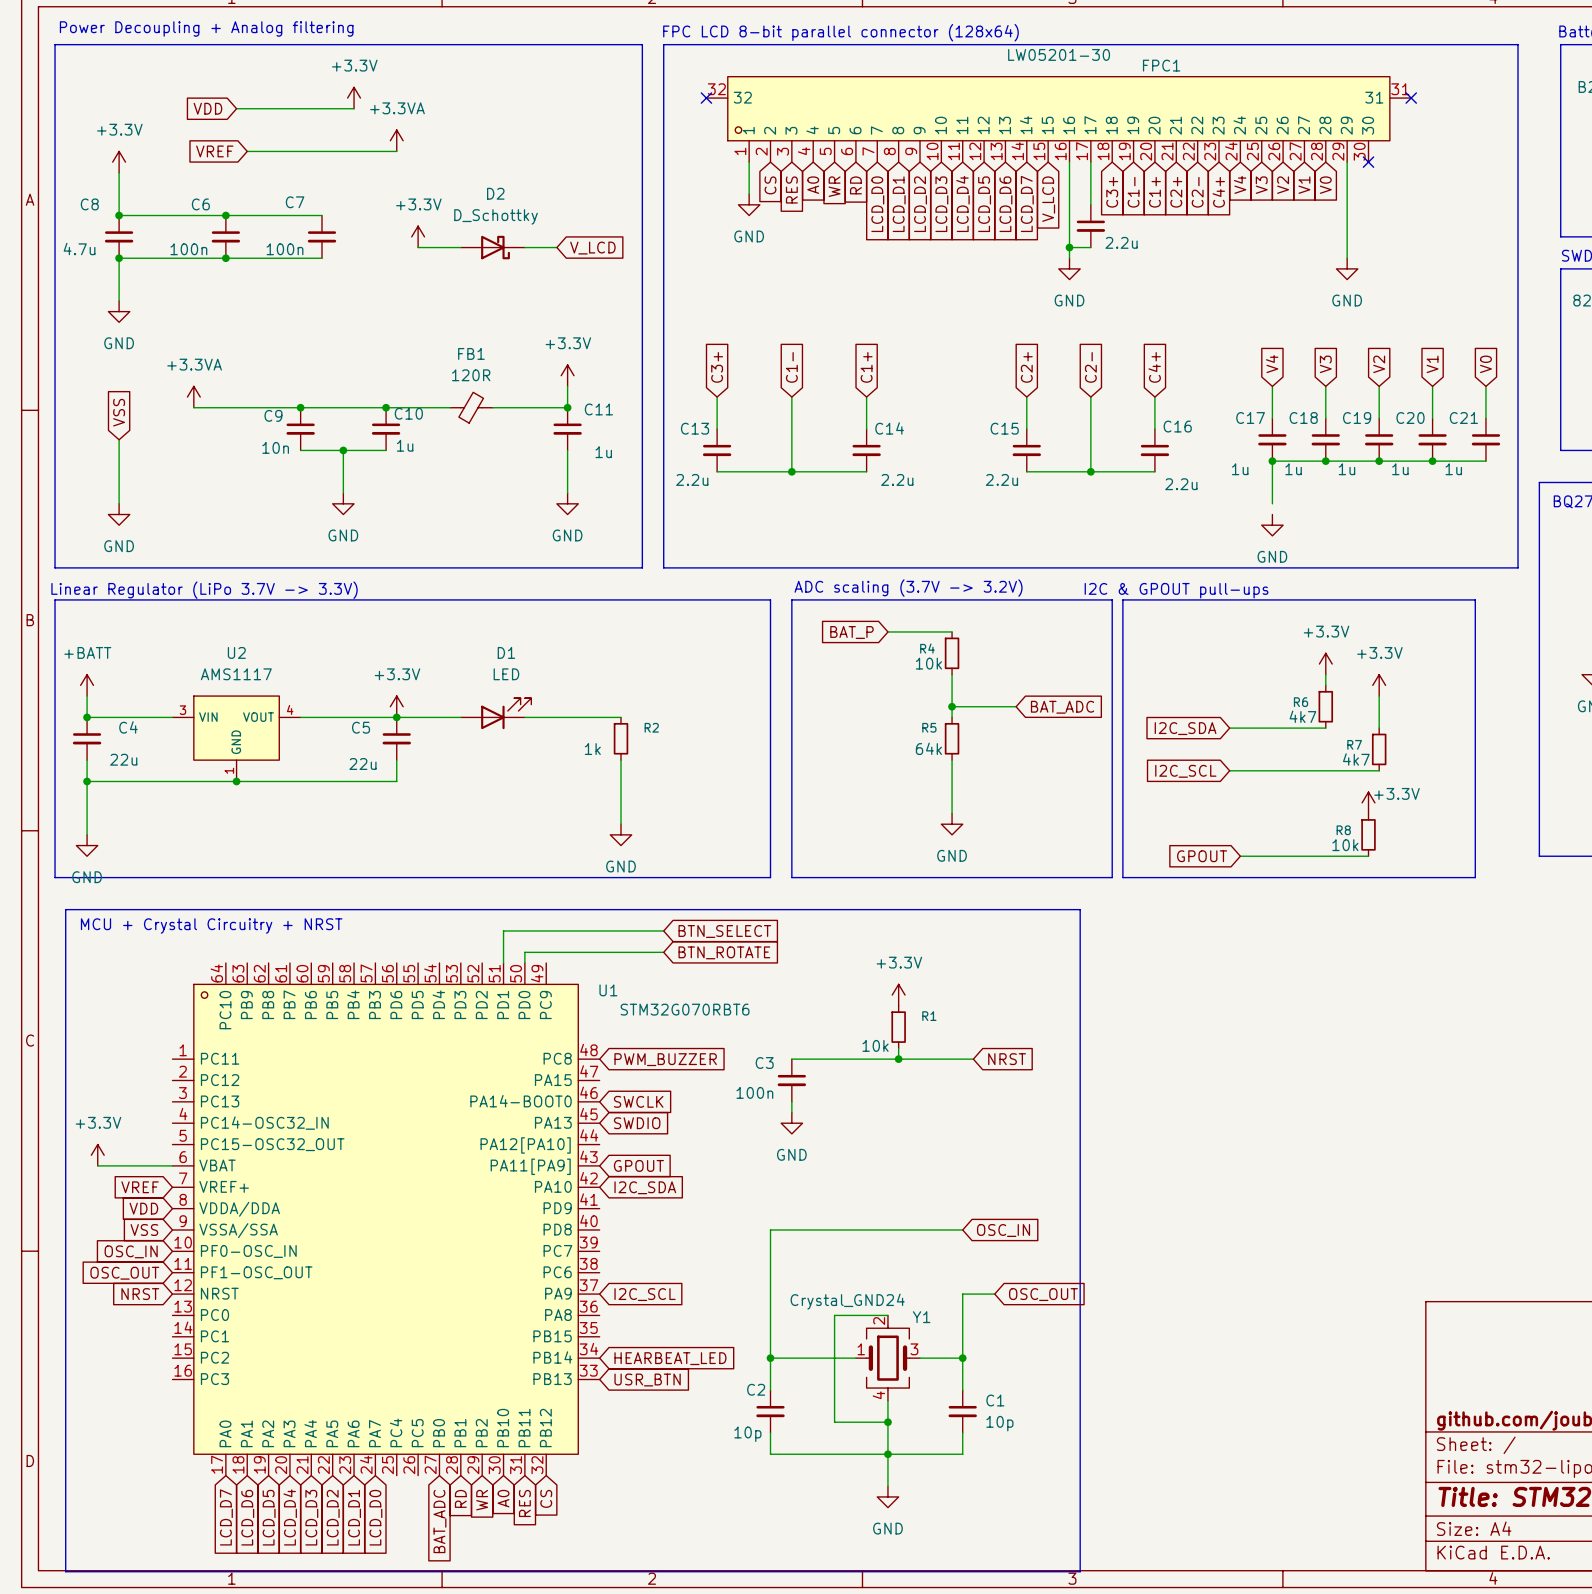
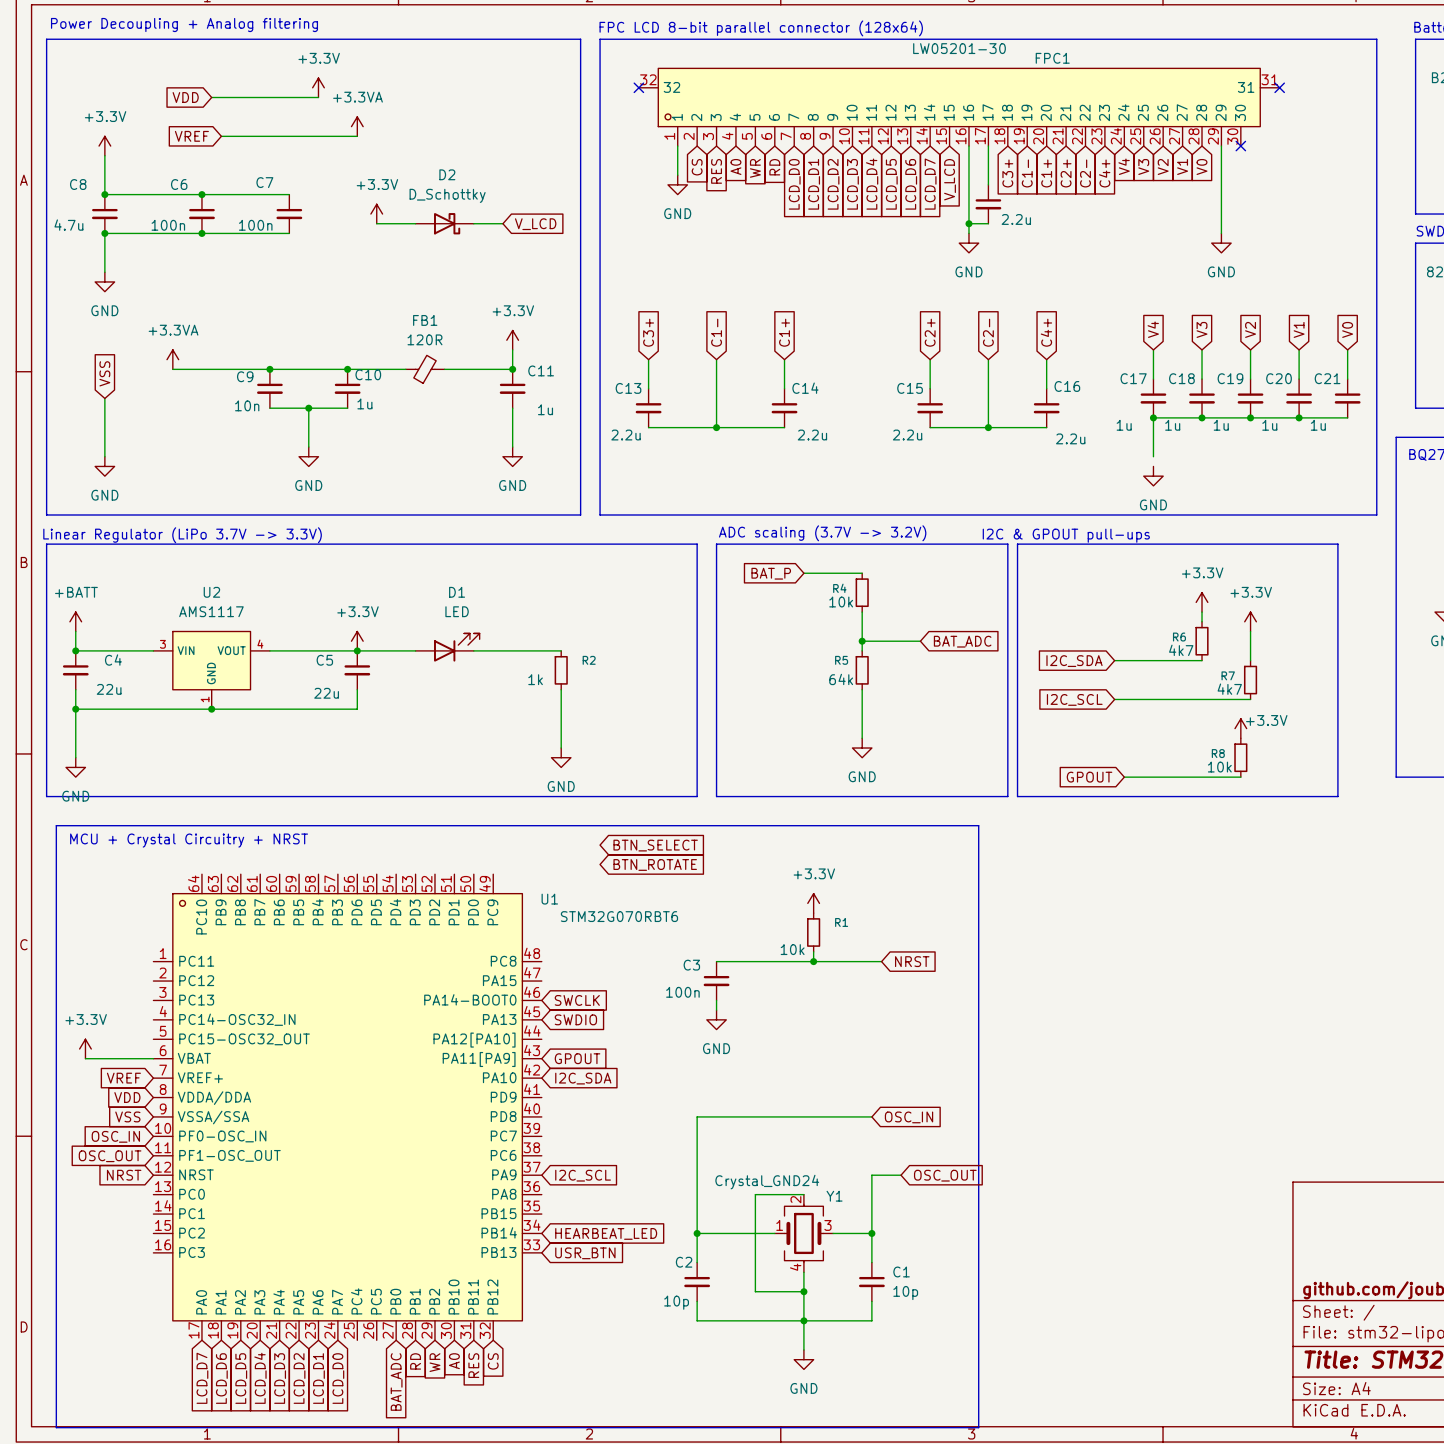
wire: (663, 930) (503, 930) (503, 963) -> none
wire: (663, 952) (524, 952) (524, 963) -> none
global label: PWM_BUZZER (665, 1059) -> none

